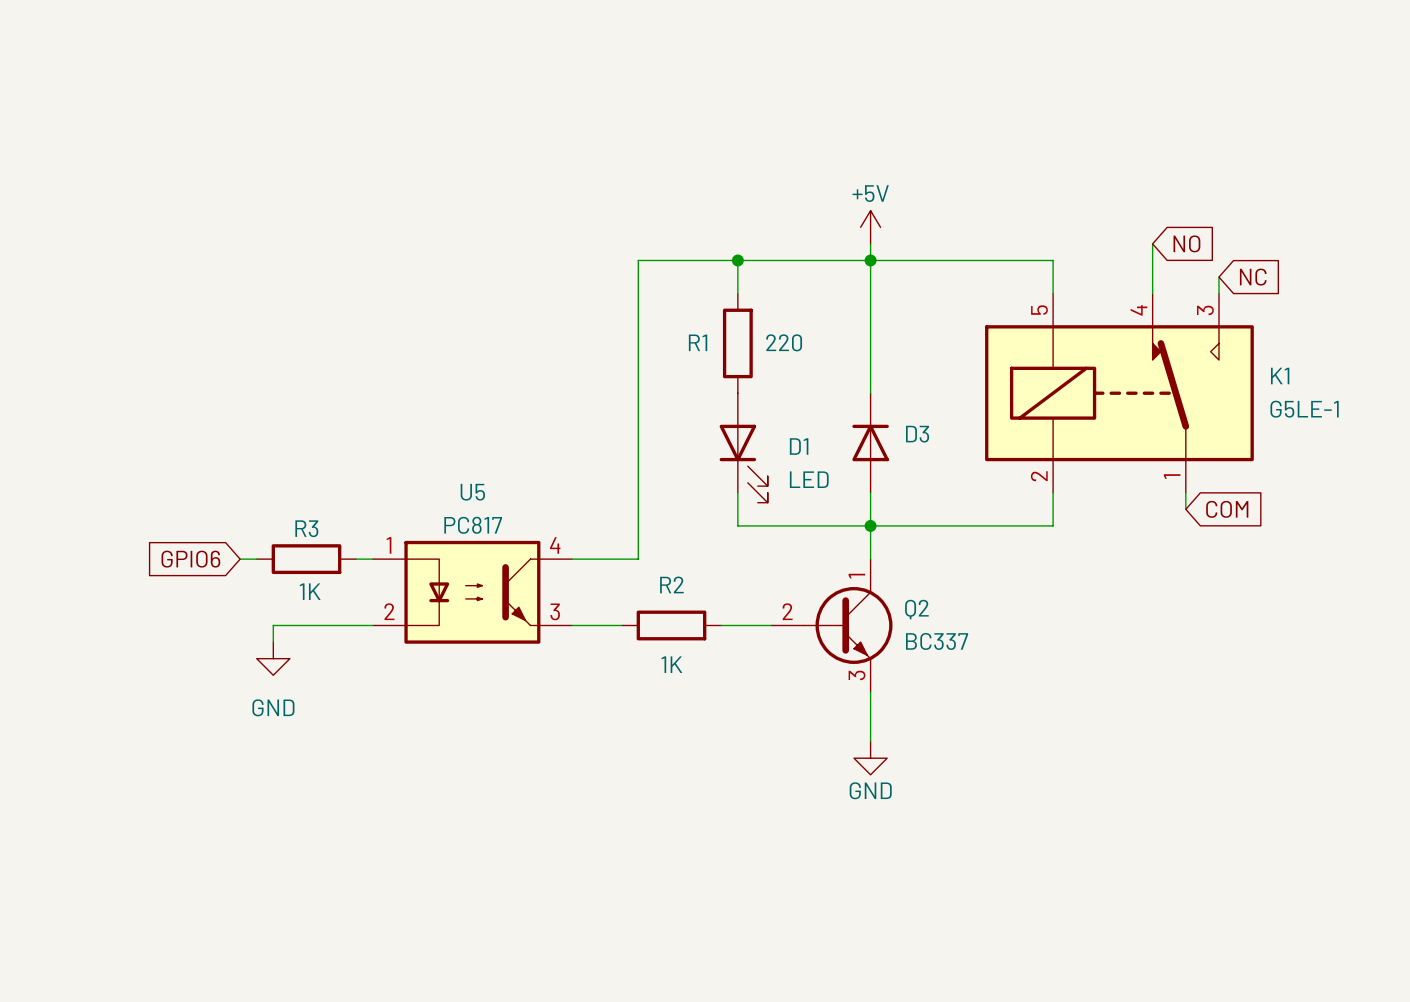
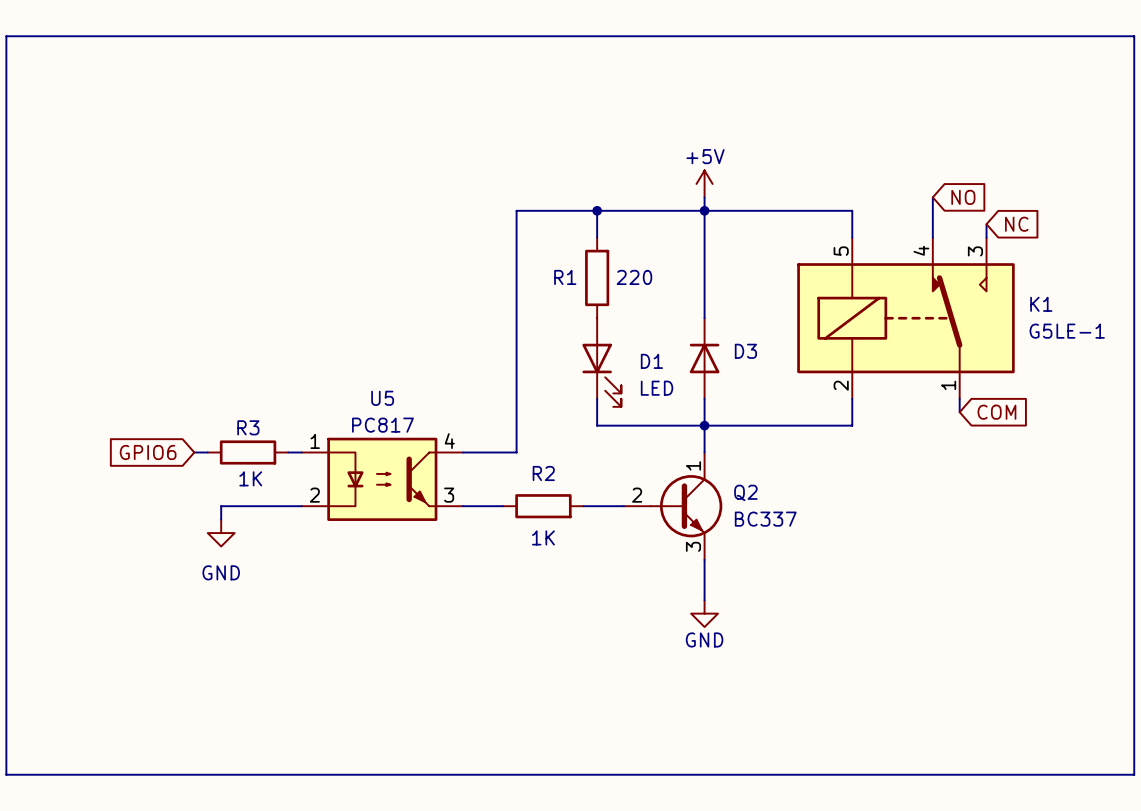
line: none -> (6, 36) (1134, 36) (1134, 774) (6, 774) (6, 36)

